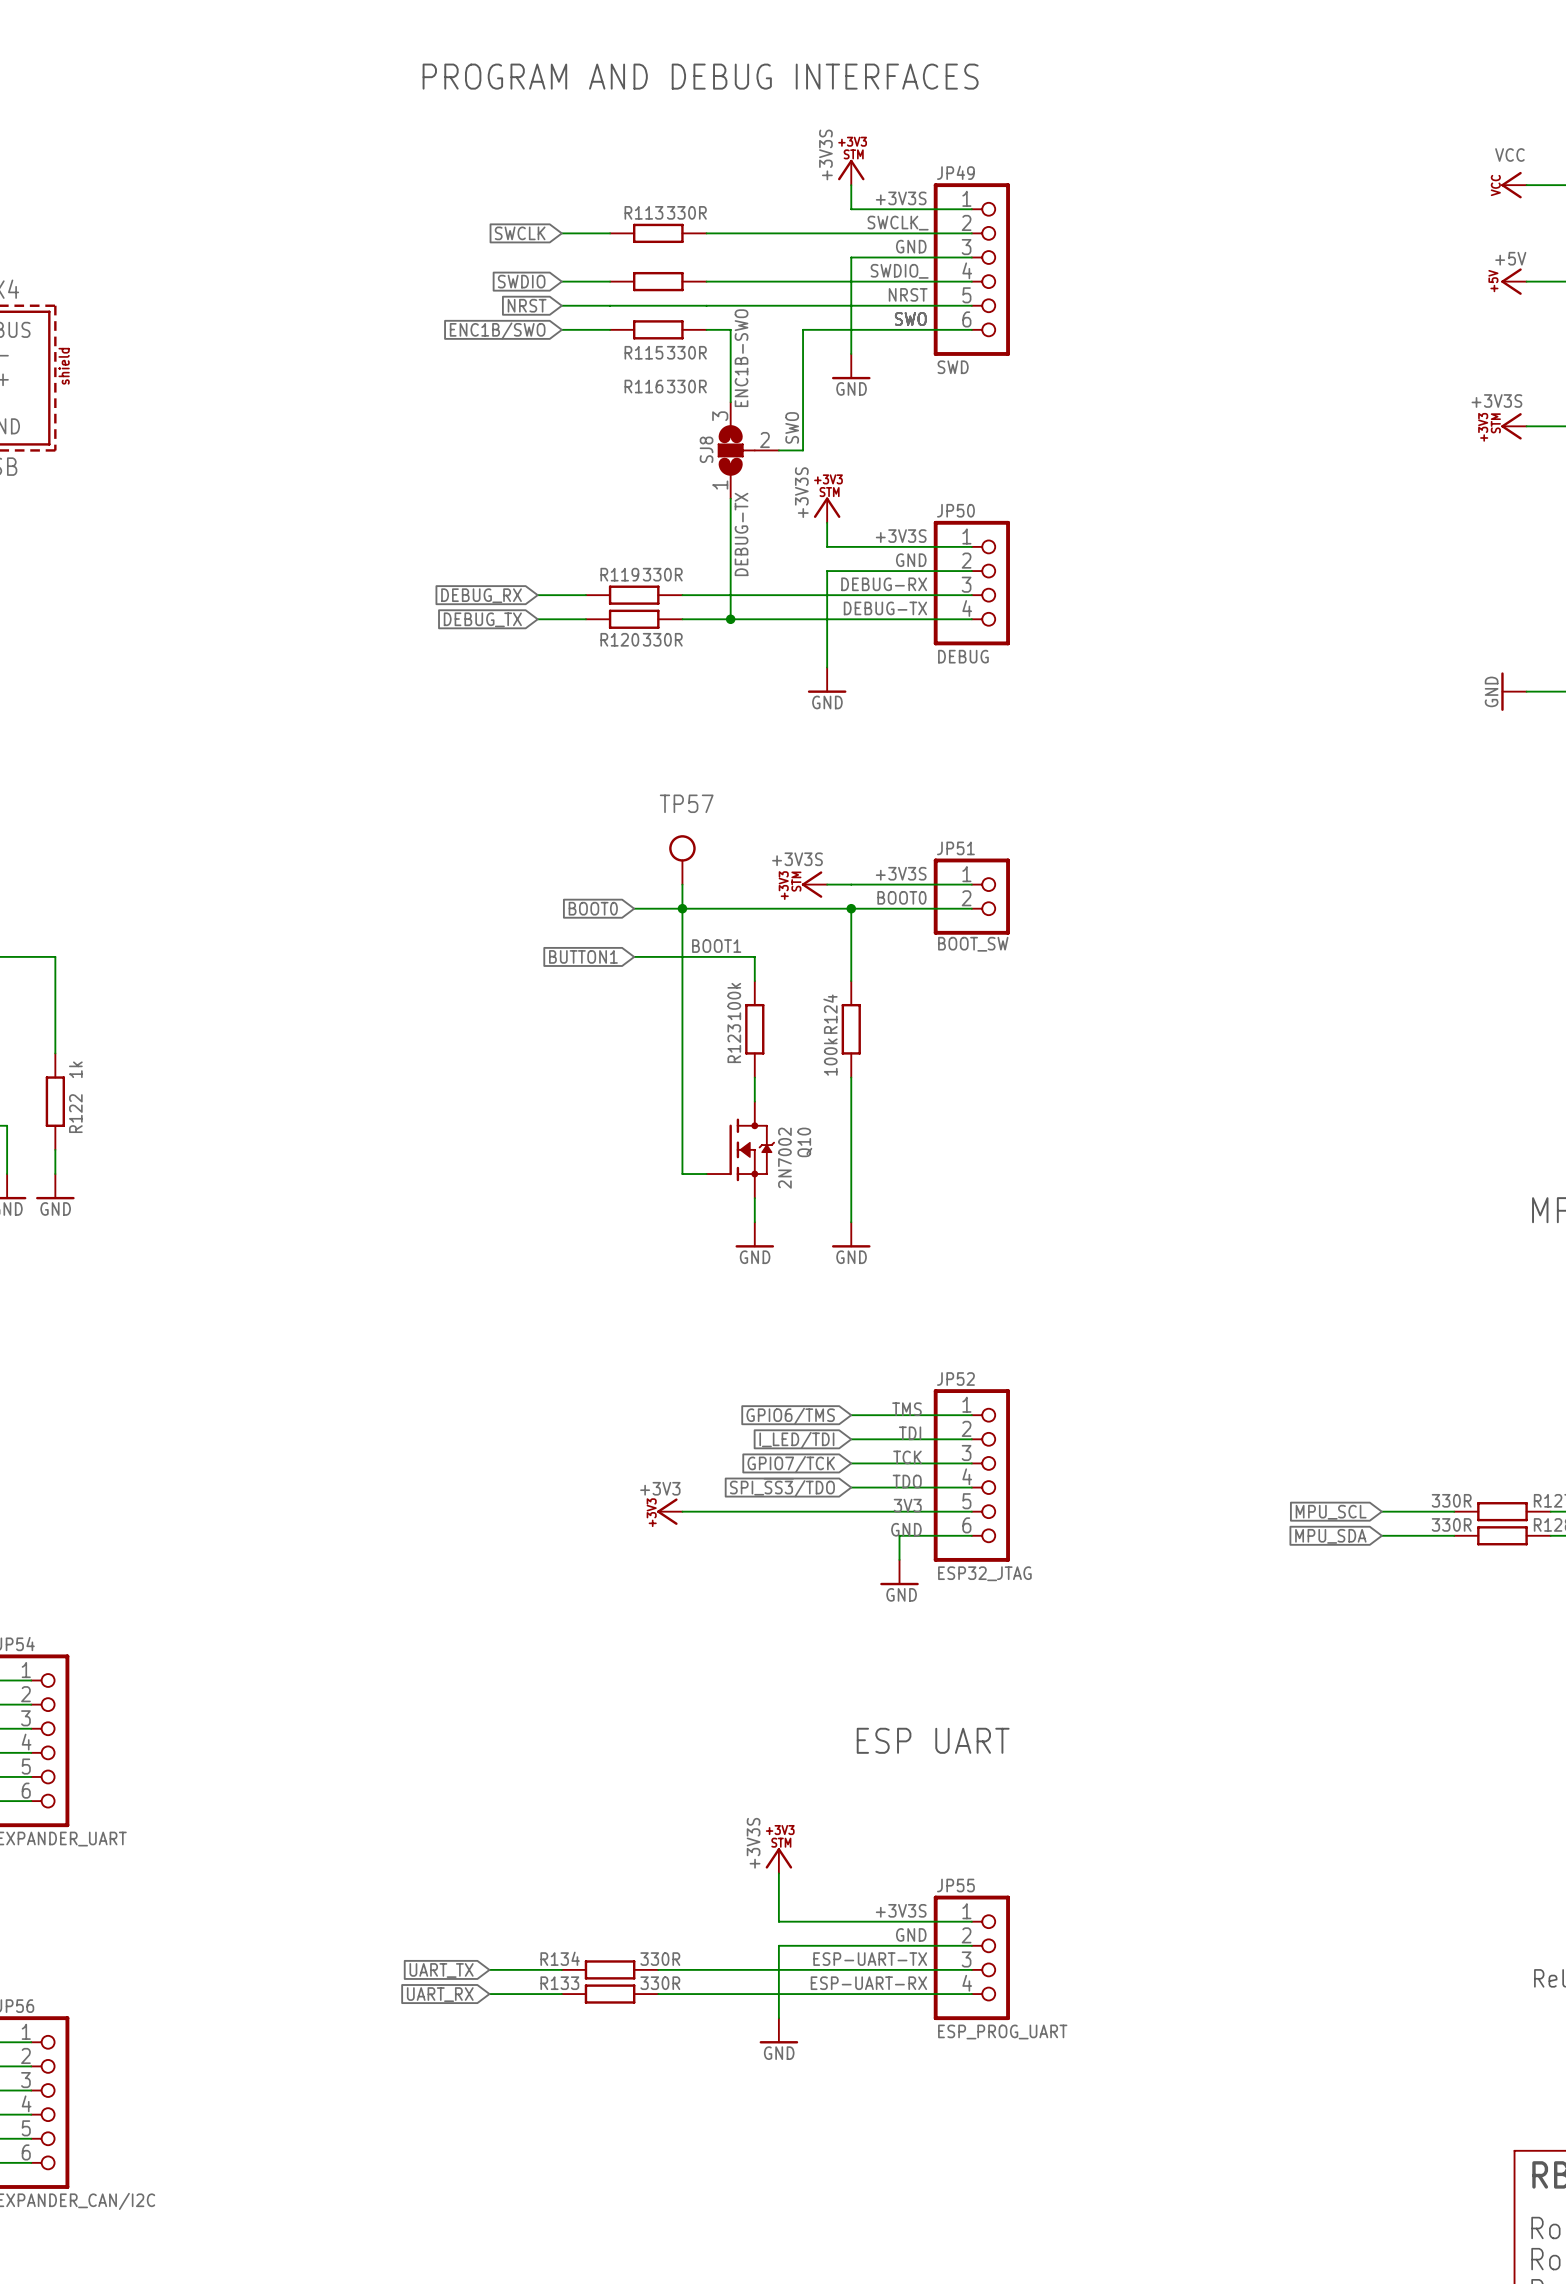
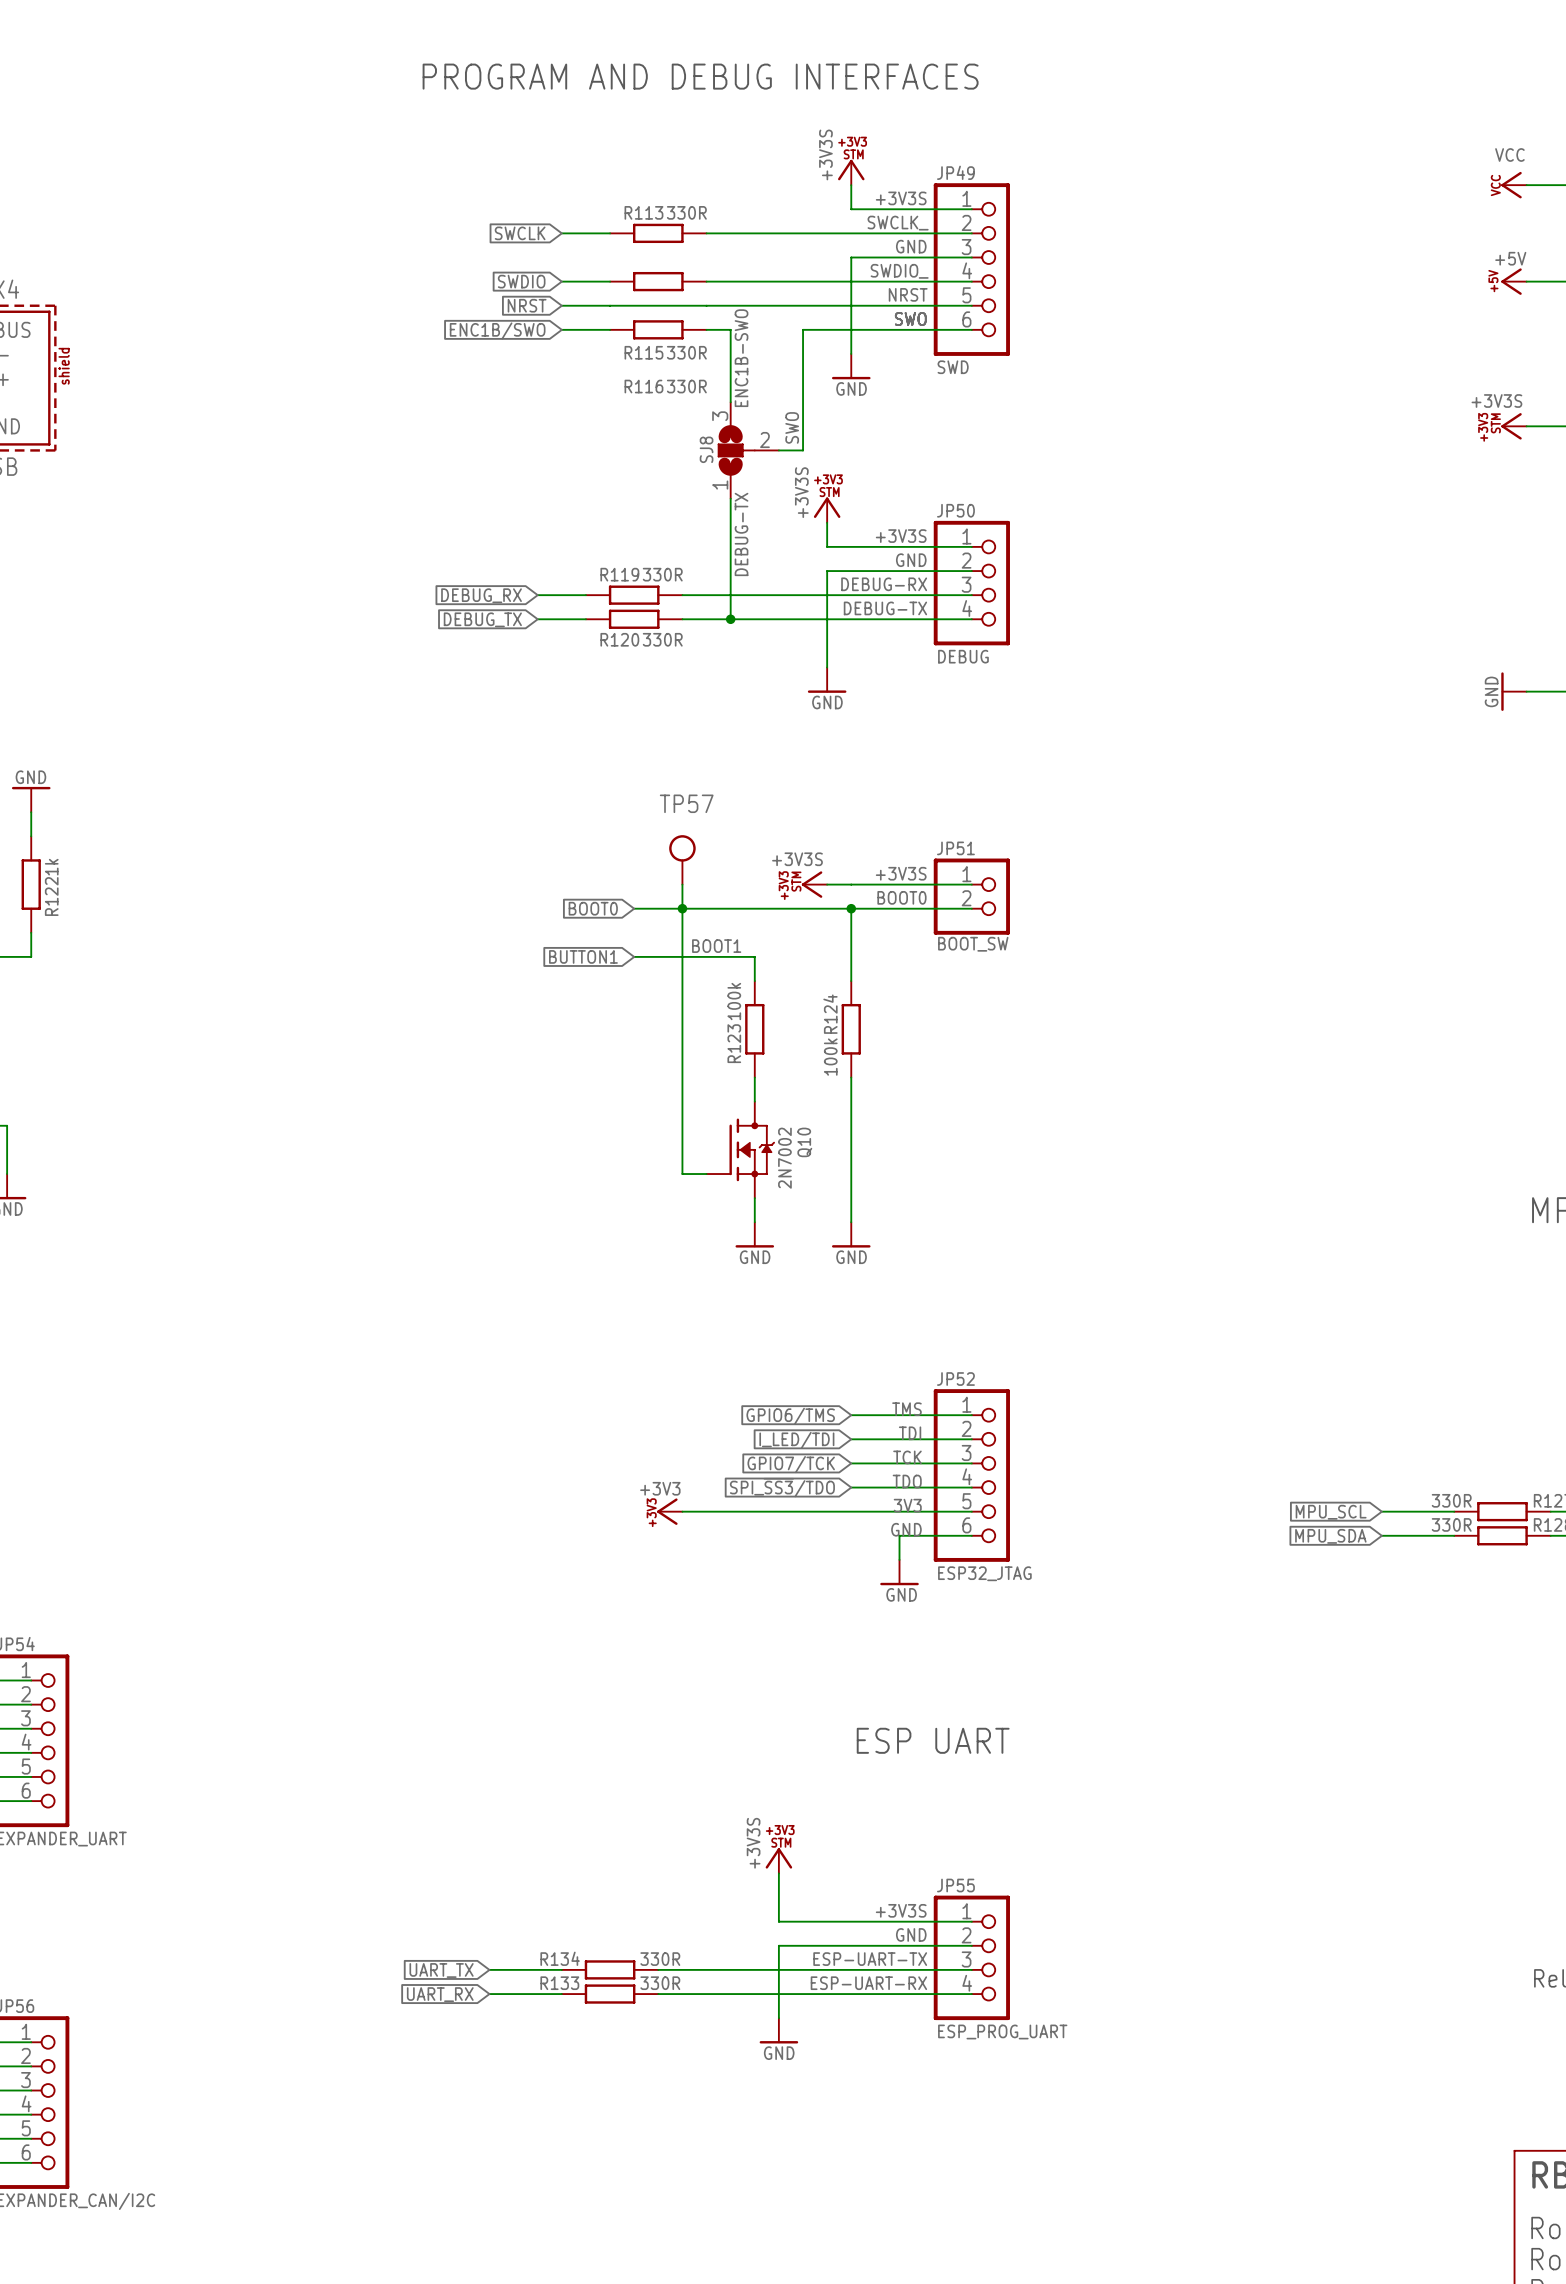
power symbol: none -> GND (31, 799)
wire: none -> (31, 812) (31, 836)
wire: (31, 956) (55, 956) (55, 1053) -> (31, 956) (31, 932)
R122 value position: 1k (75, 1069) -> 1k (51, 867)
R122 position: (55, 1101) -> (31, 884)
wire: (55, 1149) (55, 1174) -> none
power symbol: GND (55, 1186) -> none

